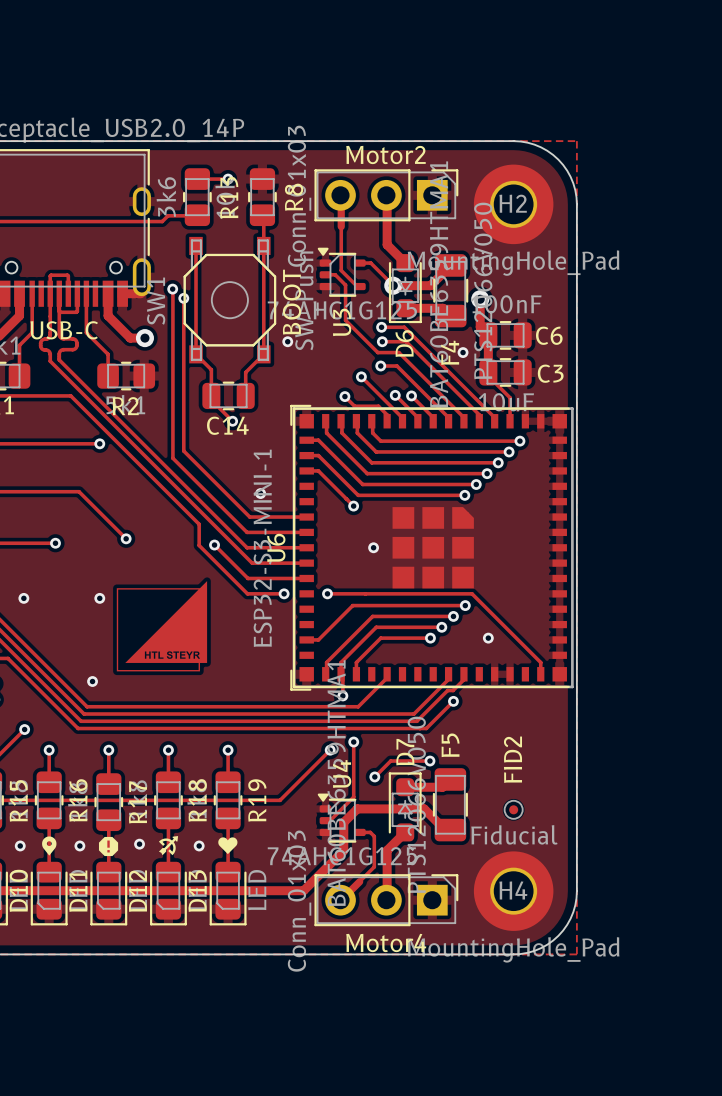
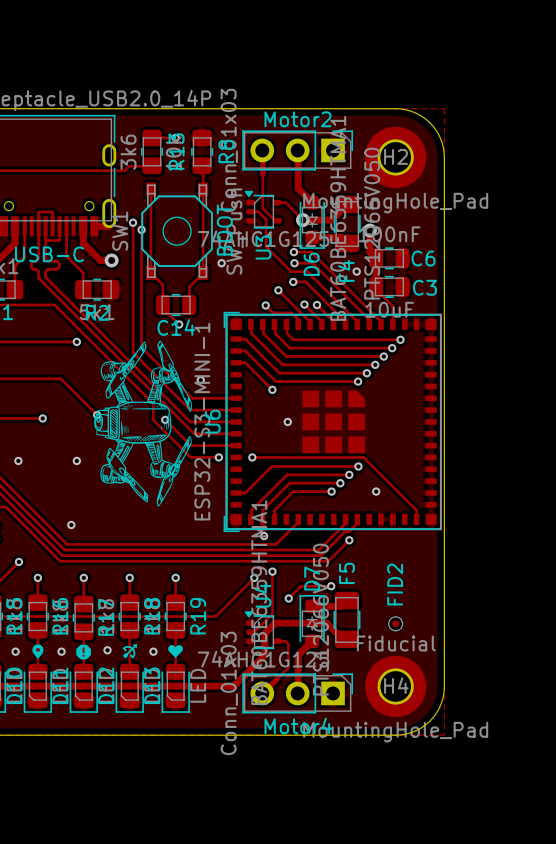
SW1 footprint: [183, 236, 277, 364] -> [141, 182, 213, 280]
drawing: none -> [94, 340, 197, 507]
drawing: [116, 581, 208, 672] -> none

